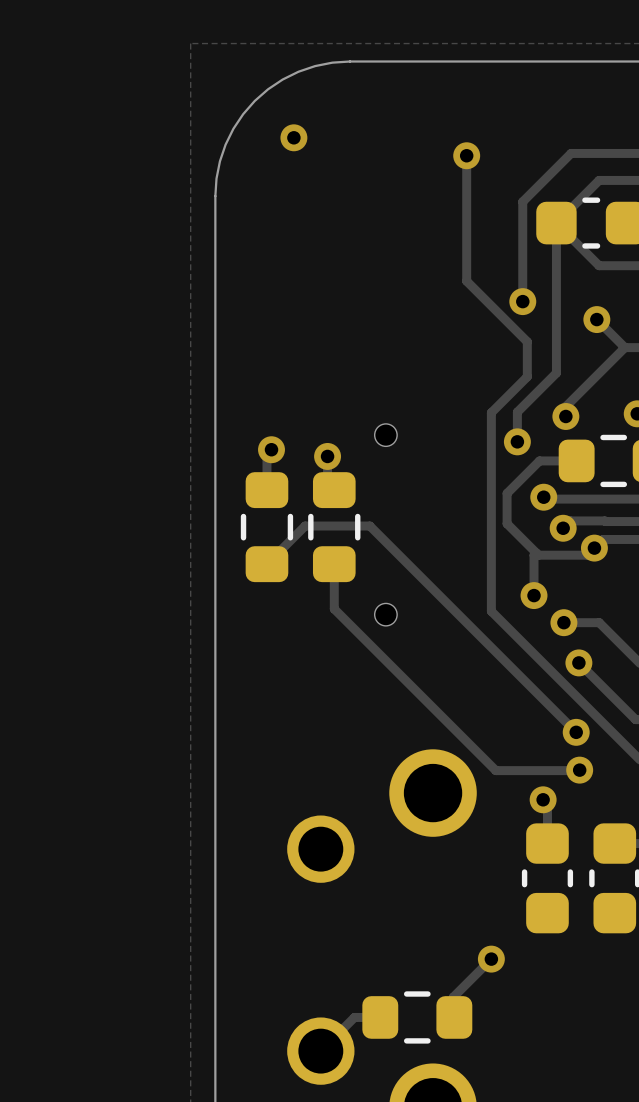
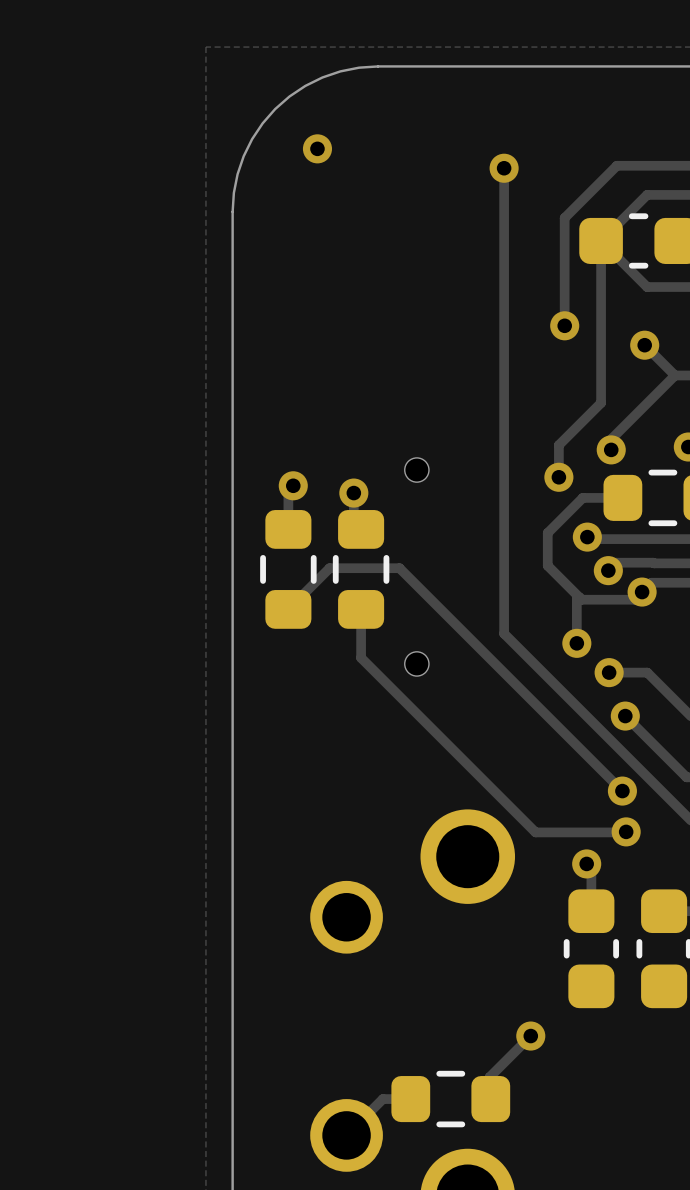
track: (466, 281) (527, 341) (527, 376) (491, 412) (491, 611) -> (504, 303) (504, 633) (530, 660)

